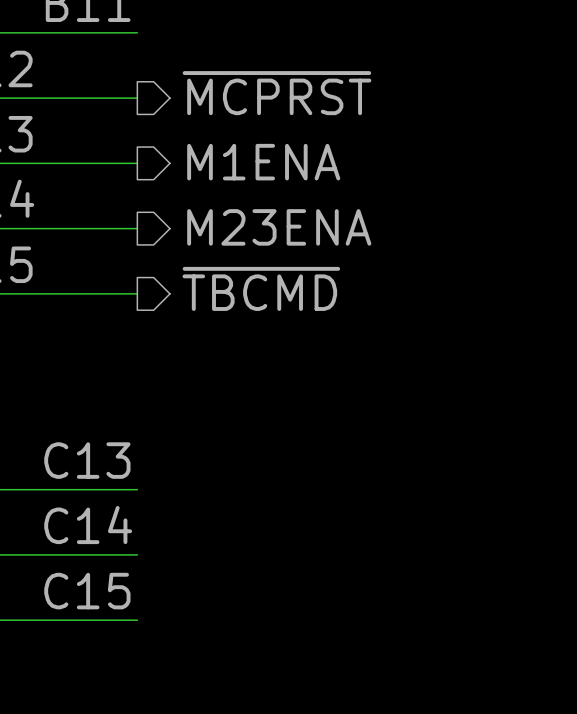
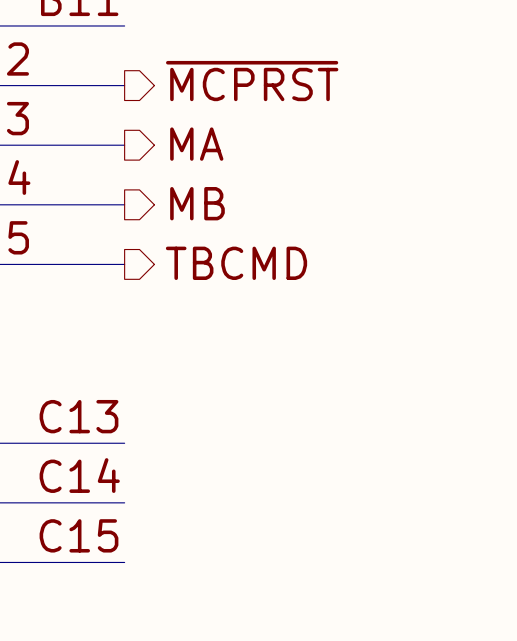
hierarchical label: M1ENA (263, 162) -> MA (196, 144)
hierarchical label: M23ENA (279, 227) -> MB (197, 203)
hierarchical label: ~{TBCMD} (261, 288) -> TBCMD (236, 263)

